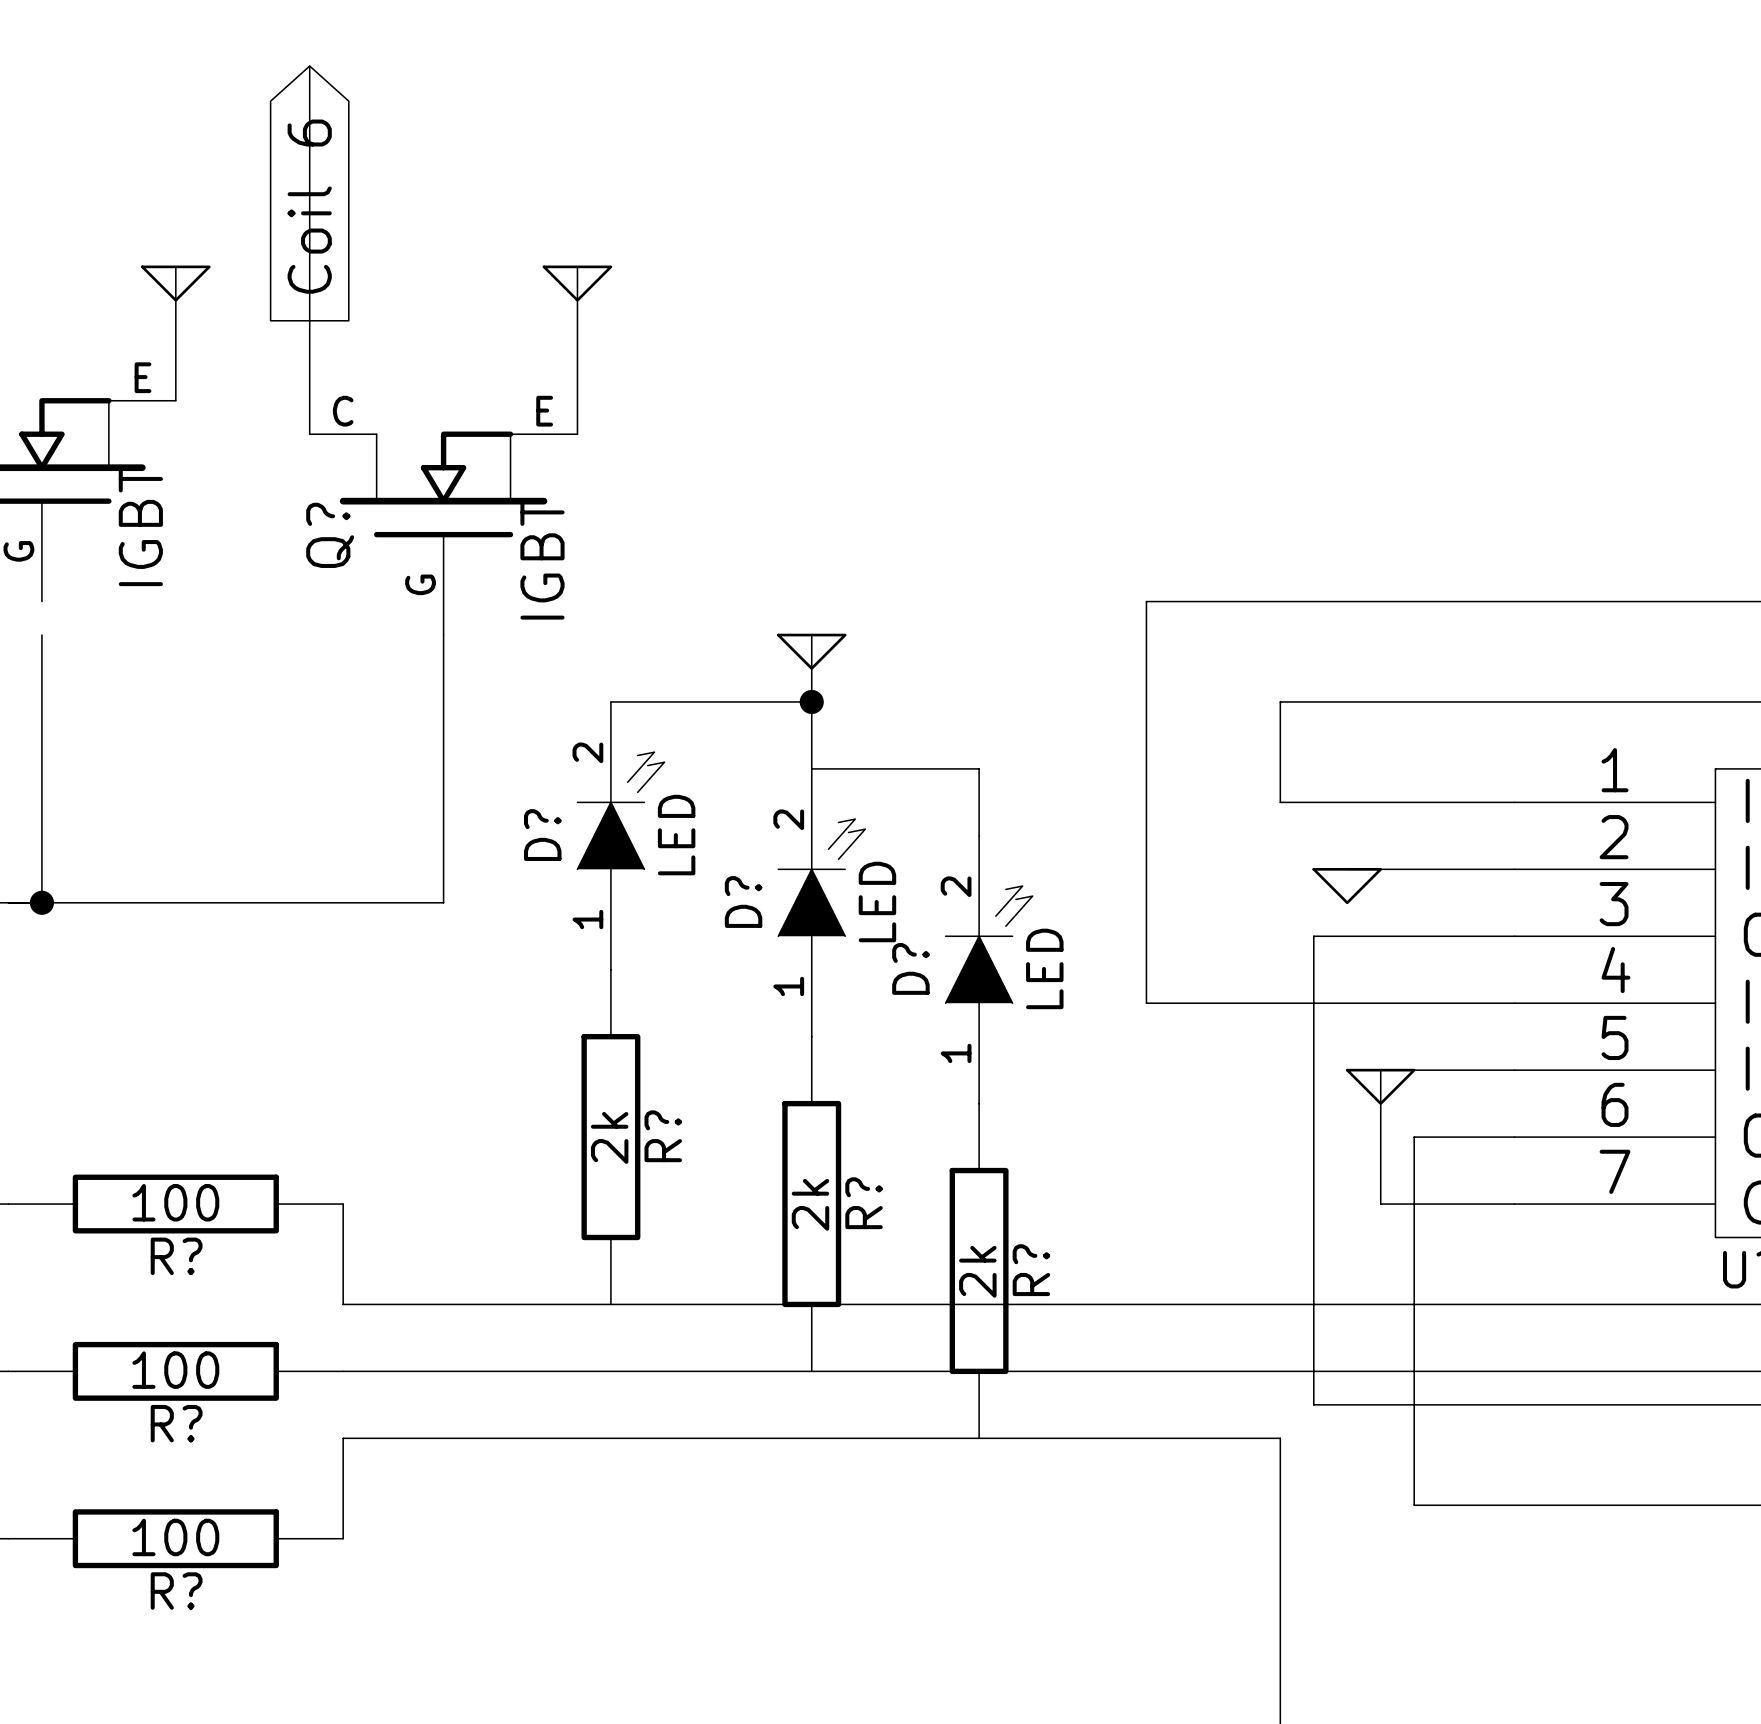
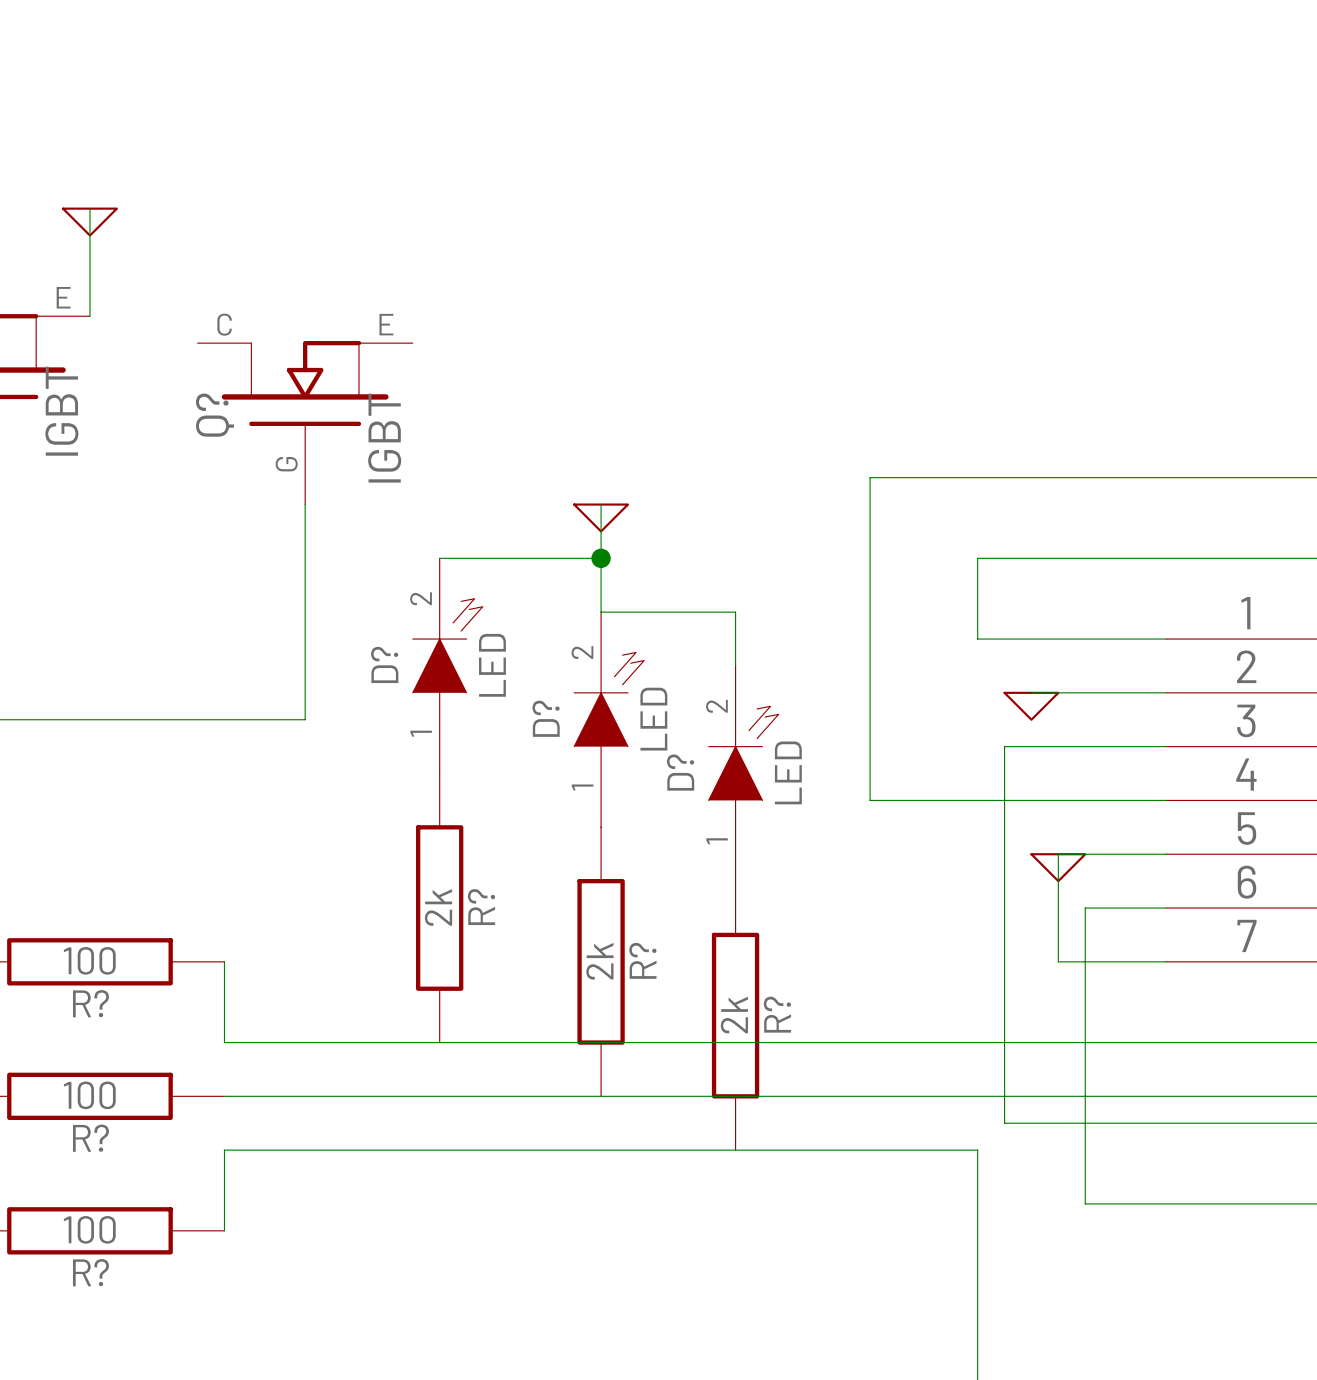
wire: (309, 66) (309, 434) -> none
global label: Coil 6 (309, 206) -> none
wire: (543, 266) (577, 266) (577, 434) -> none
power symbol: (577, 283) -> none

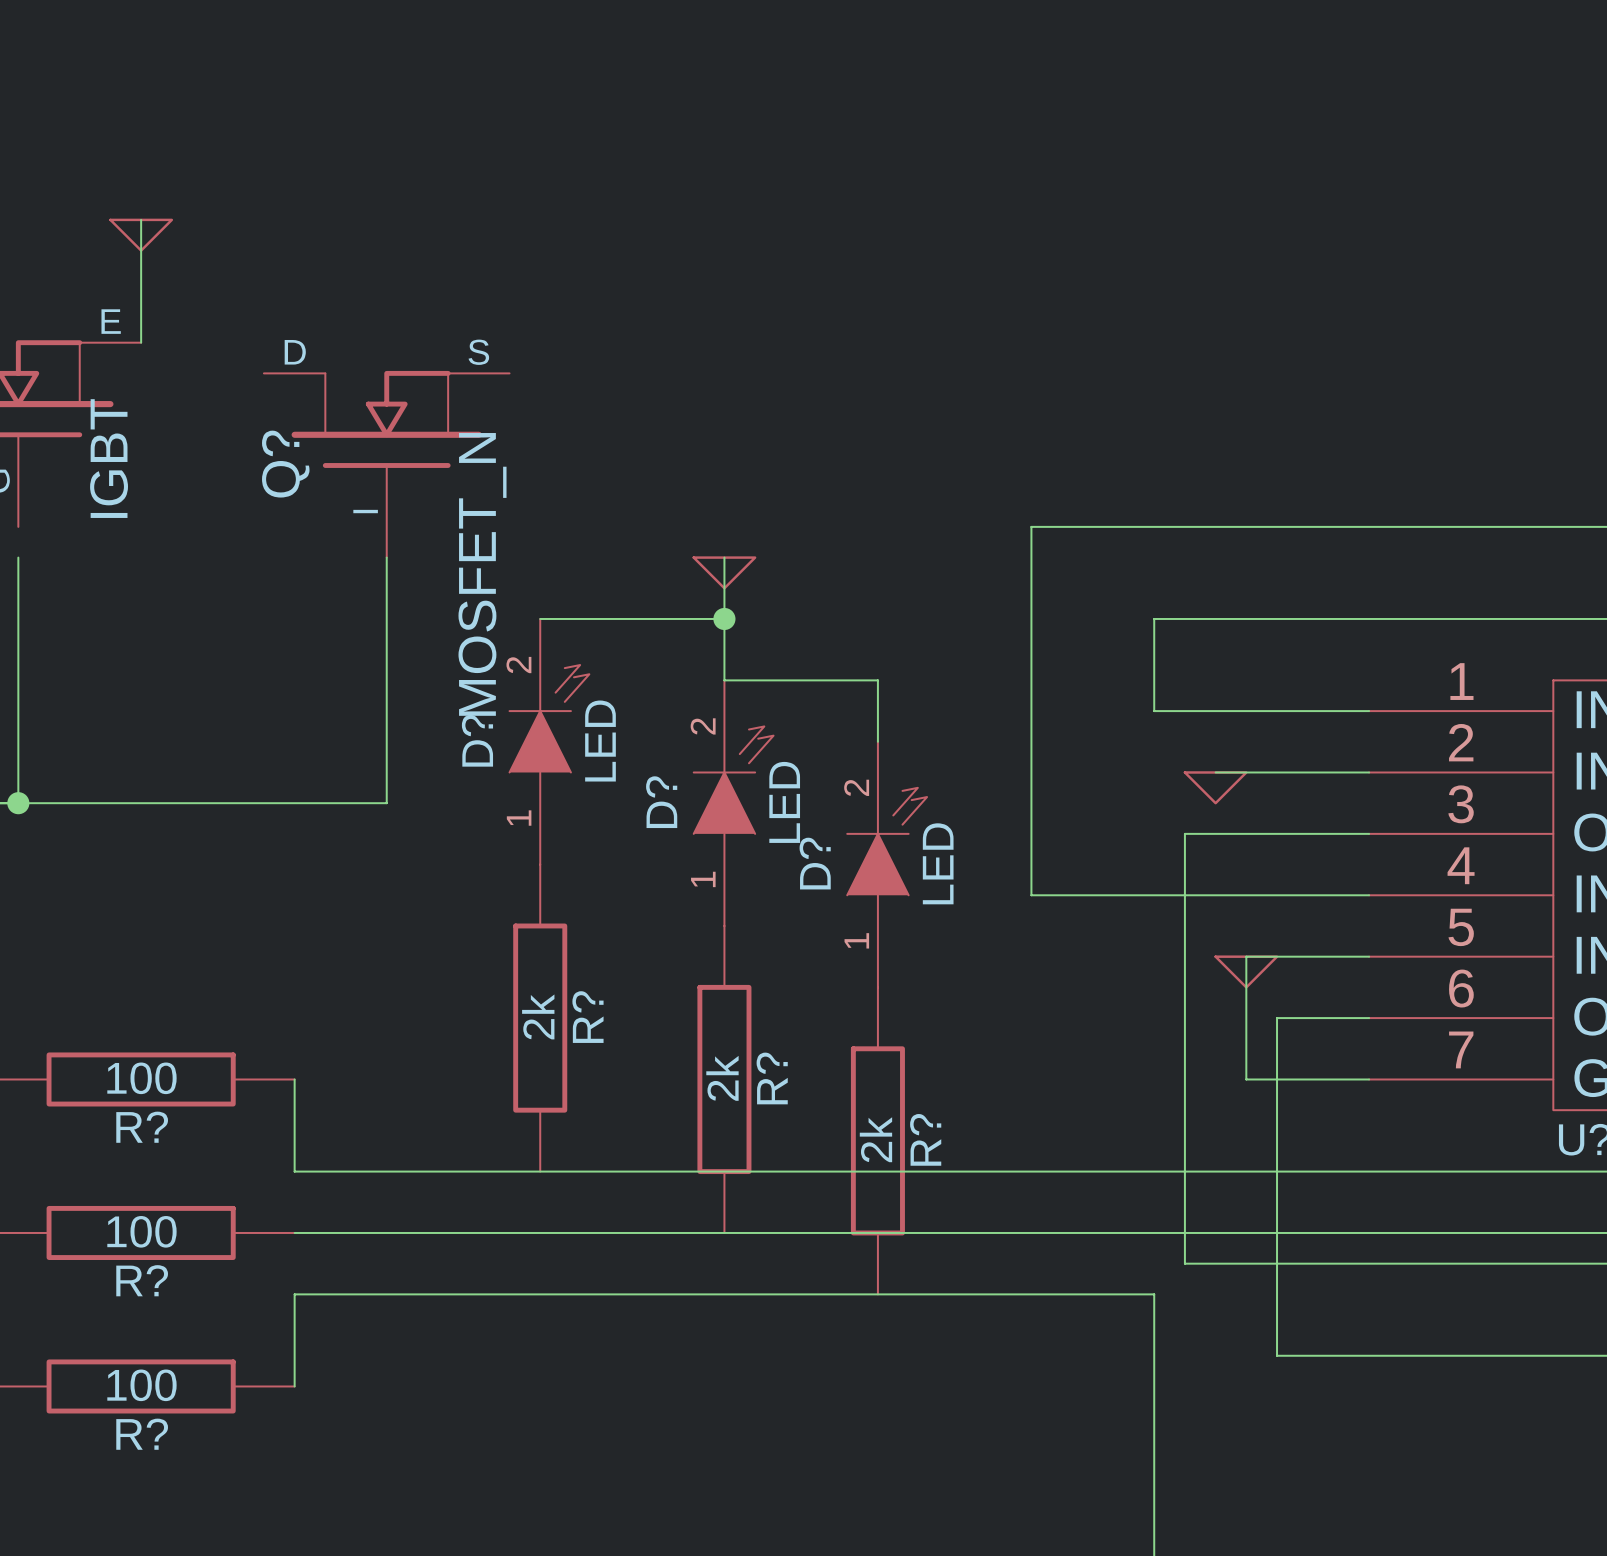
Q? pin name: C (224, 324) -> D (295, 352)
Q? pin name: E (386, 324) -> S (478, 352)
Q? value: IGBT (384, 438) -> MOSFET_N (482, 574)
Q? pin name: G (286, 464) -> I (365, 511)

